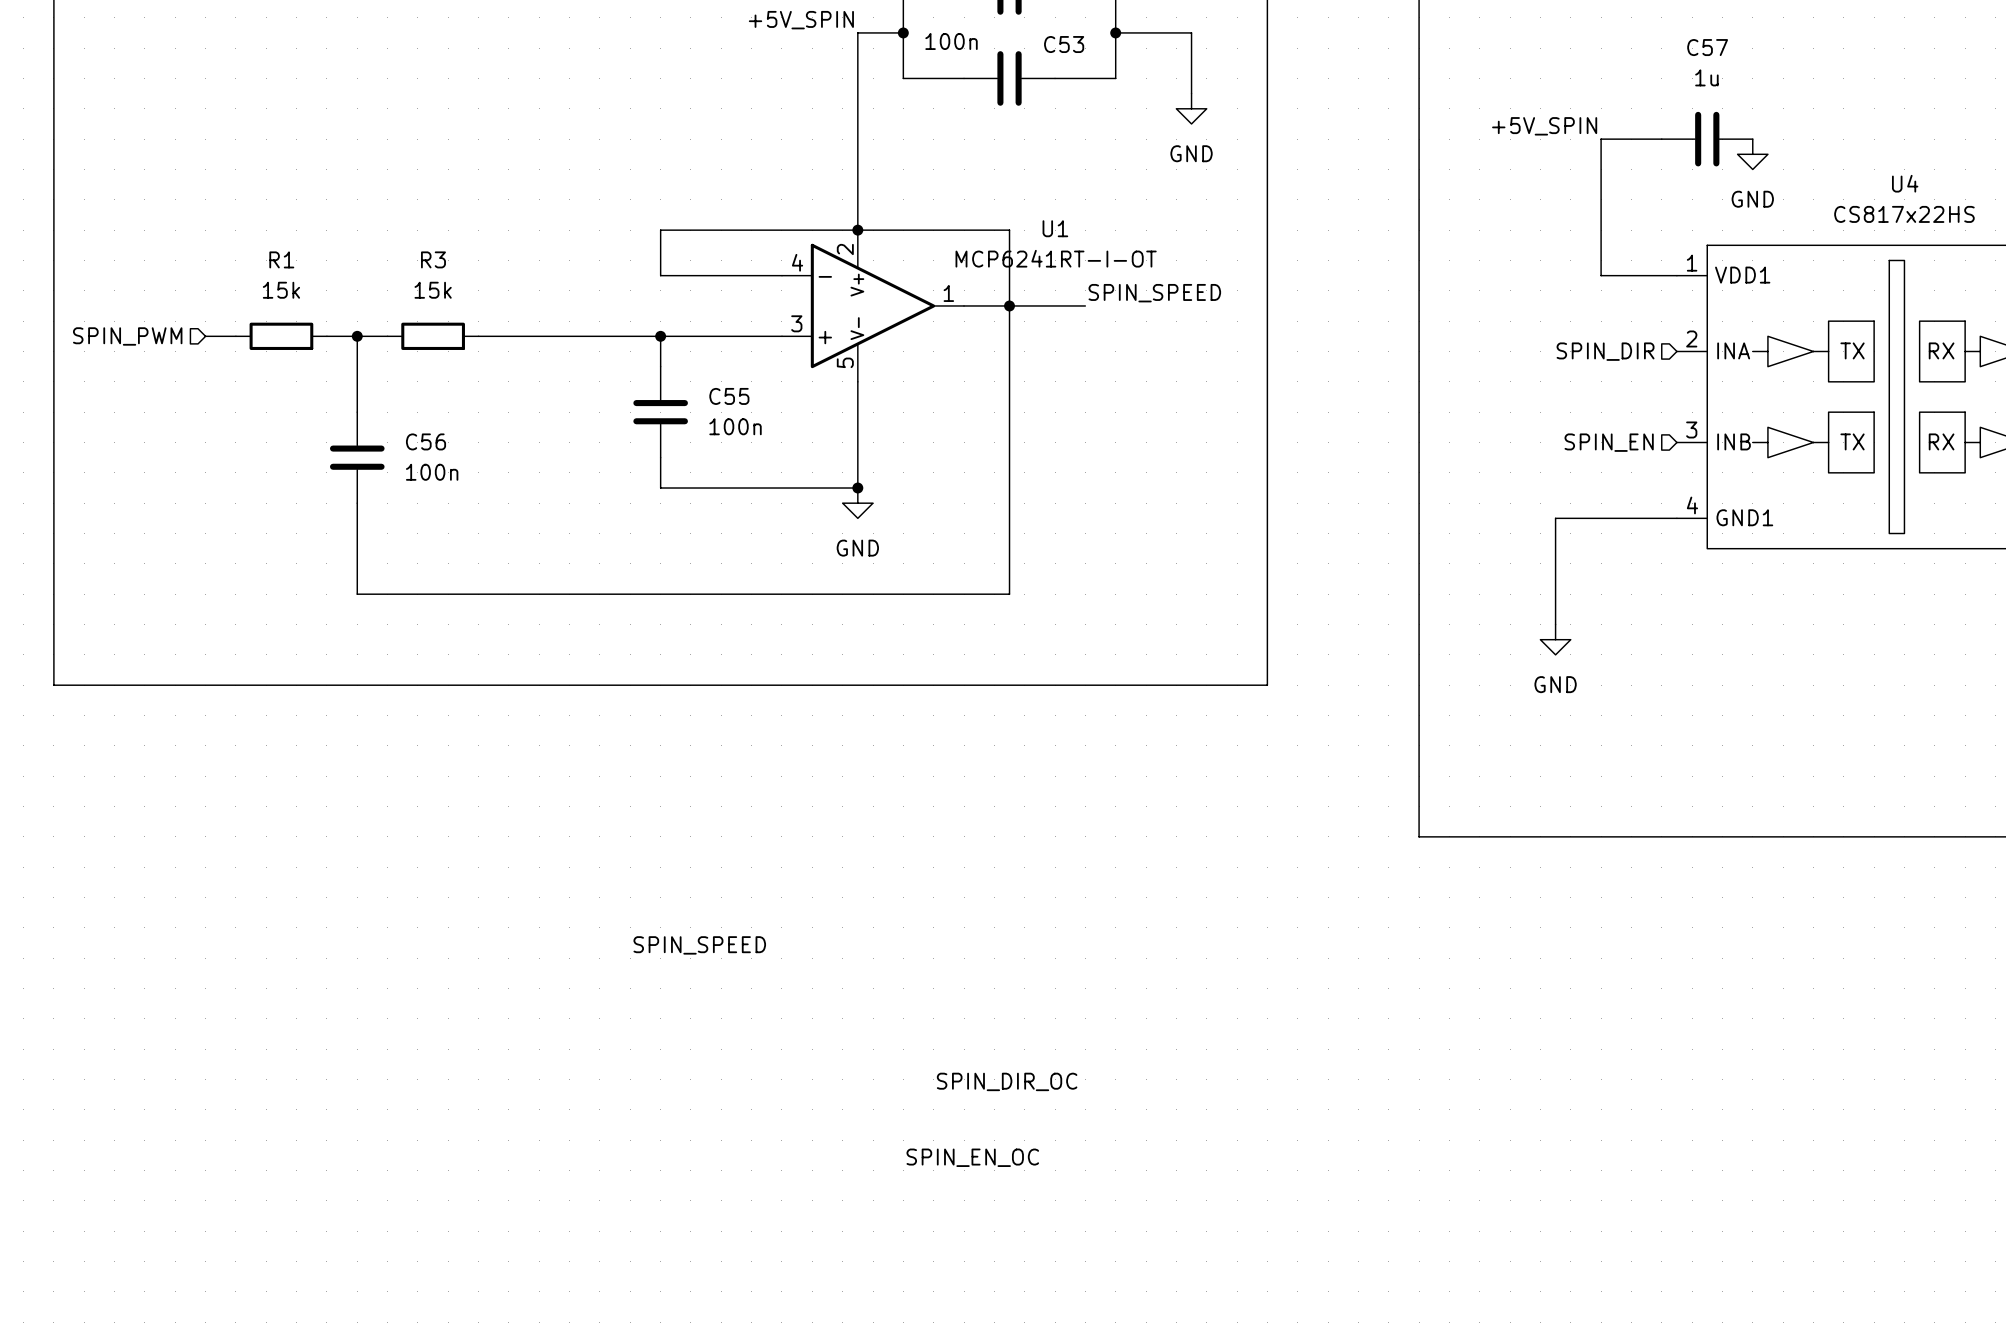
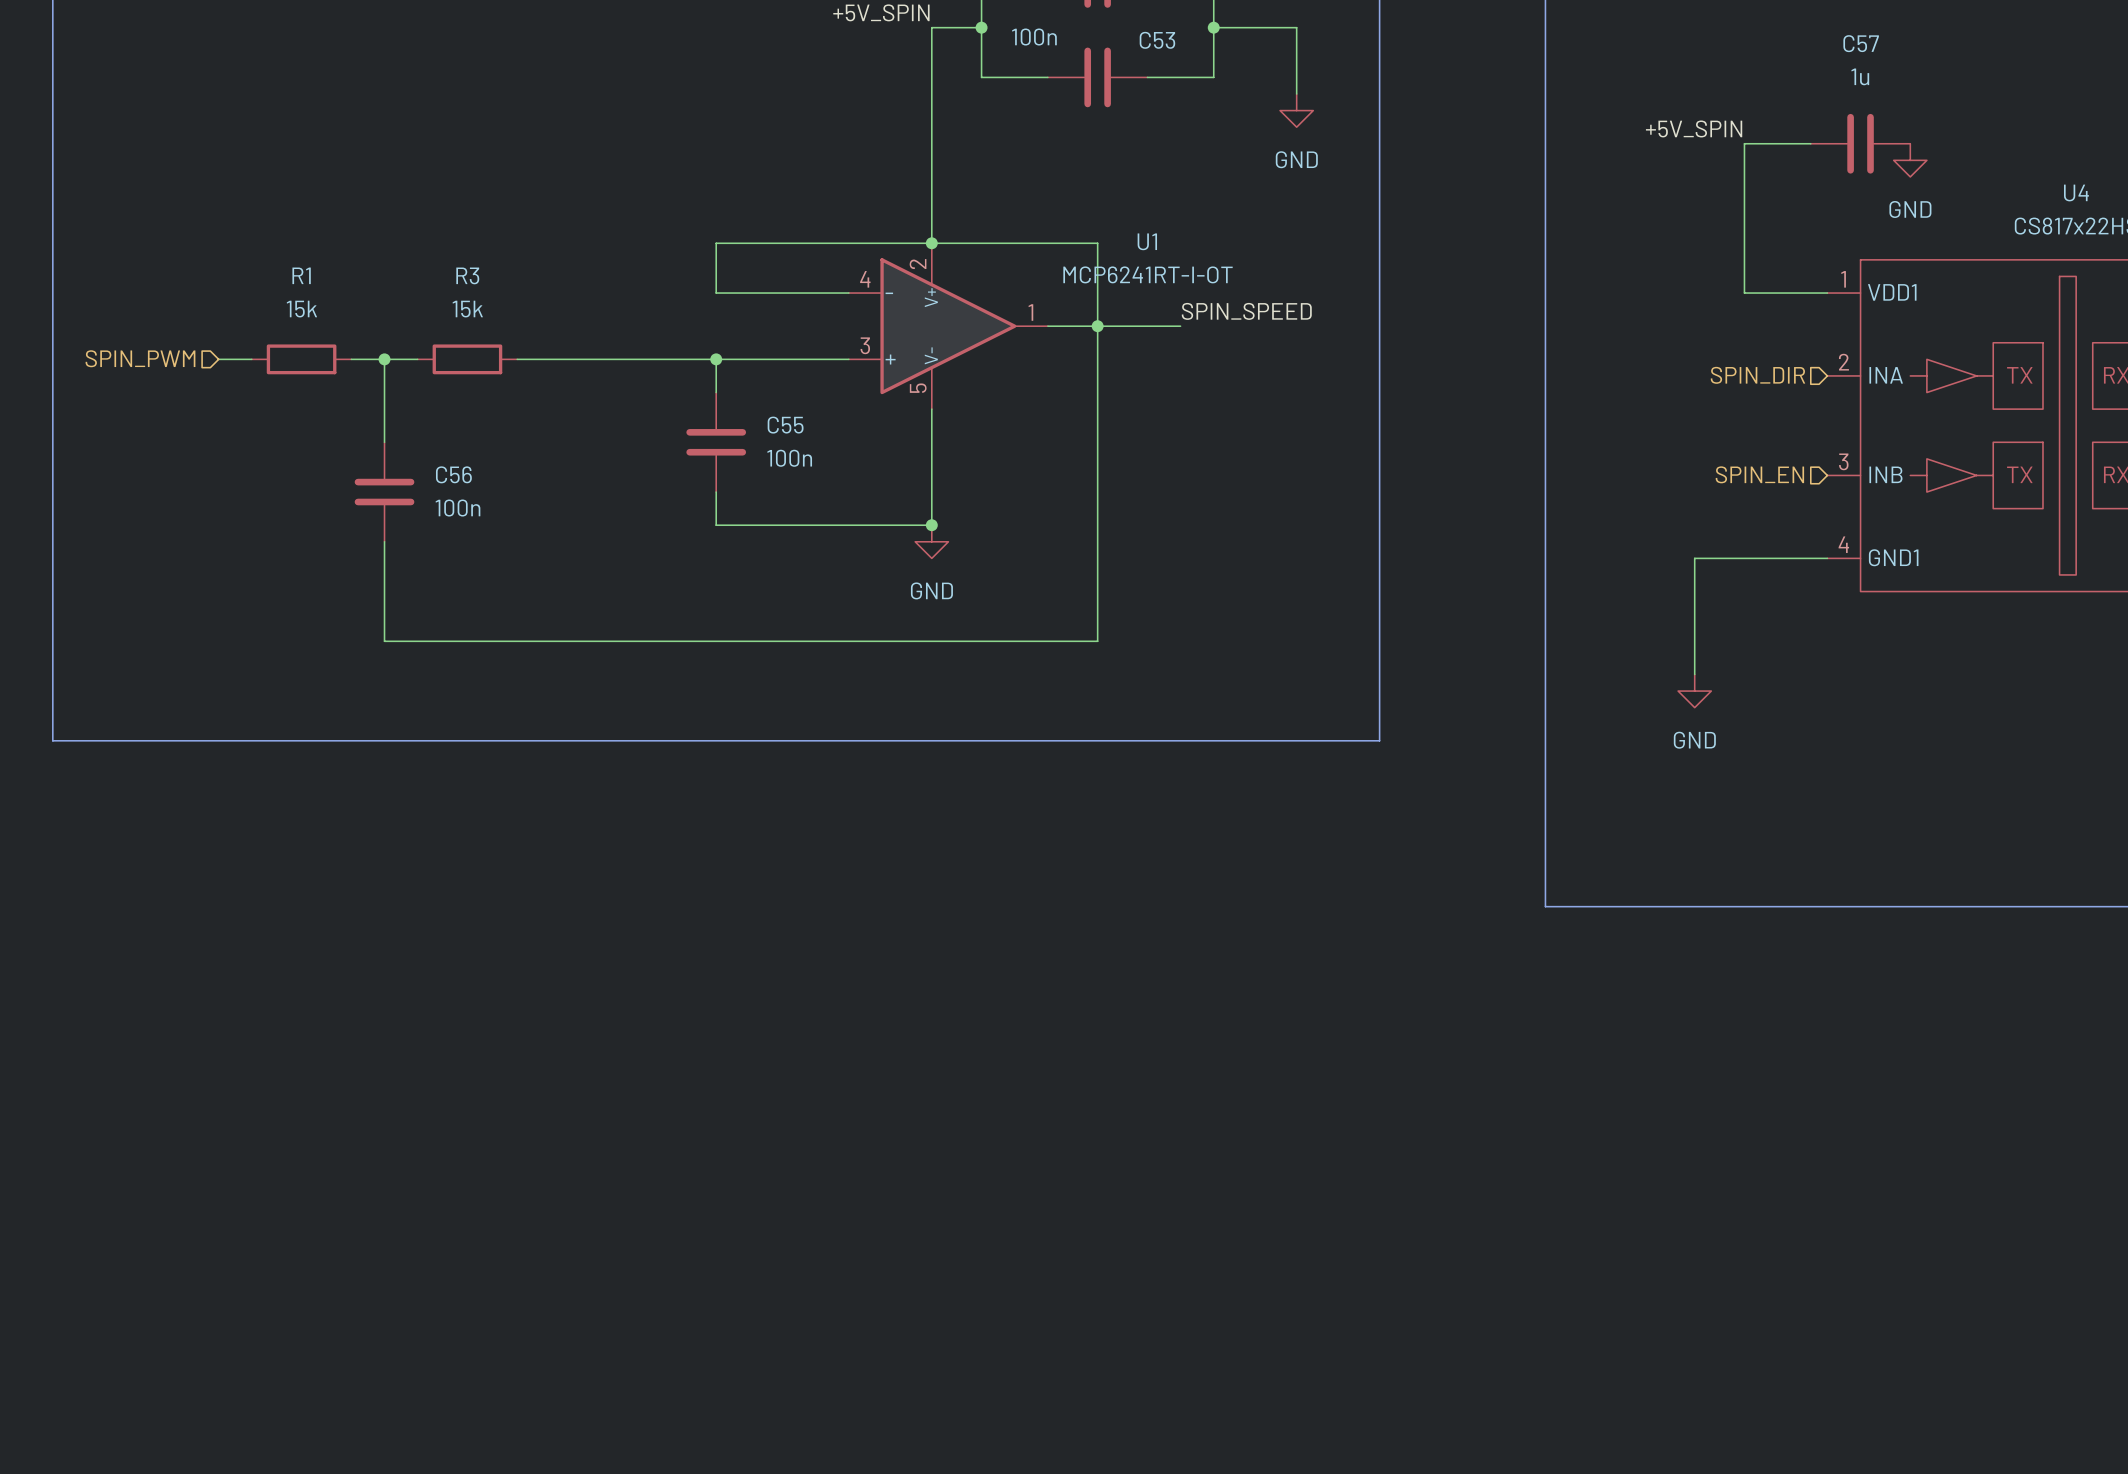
label: SPIN_SPEED (699, 945) -> none
label: SPIN_DIR_OC (1007, 1081) -> none
label: SPIN_EN_OC (972, 1157) -> none

